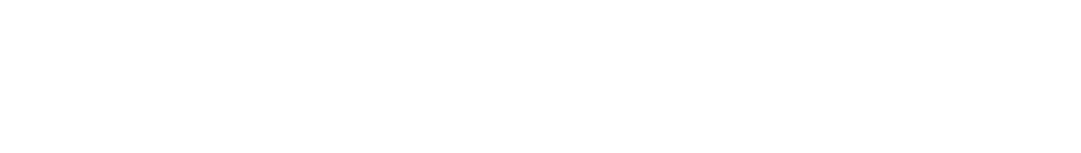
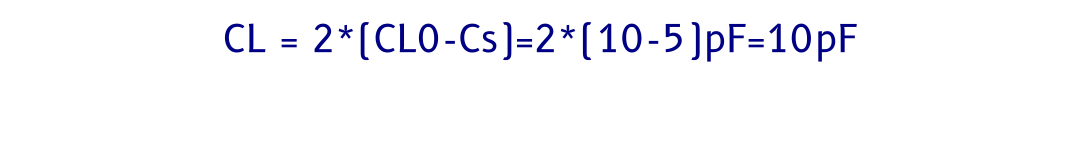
text: none -> CL = 2*(CL0-Cs)=2*(10-5)pF=10pF (540, 41)

